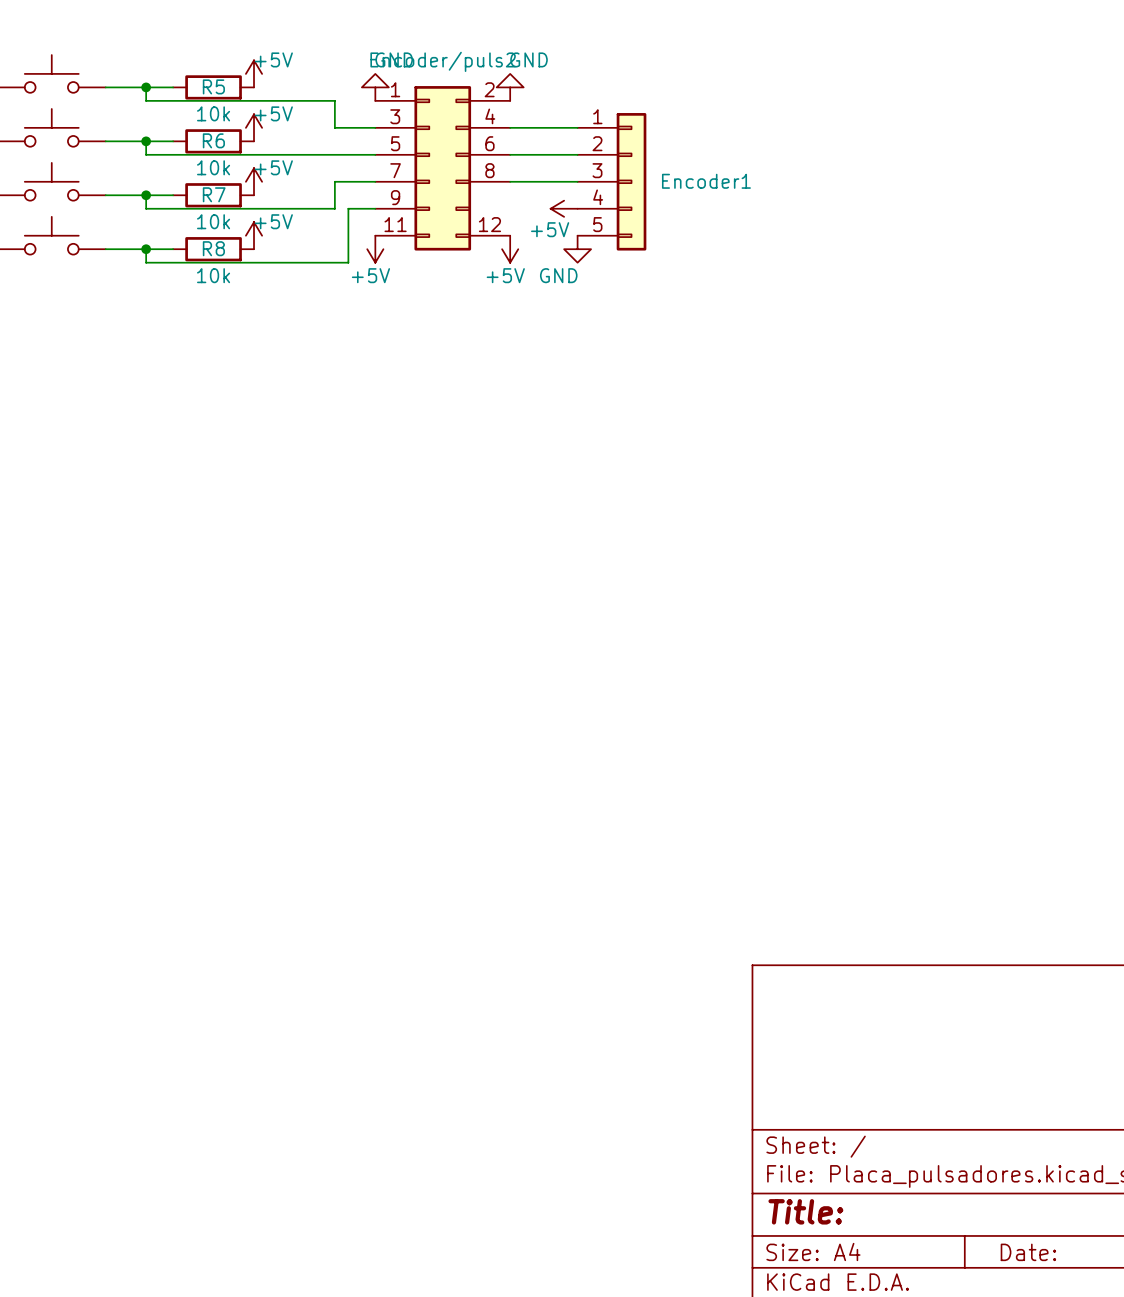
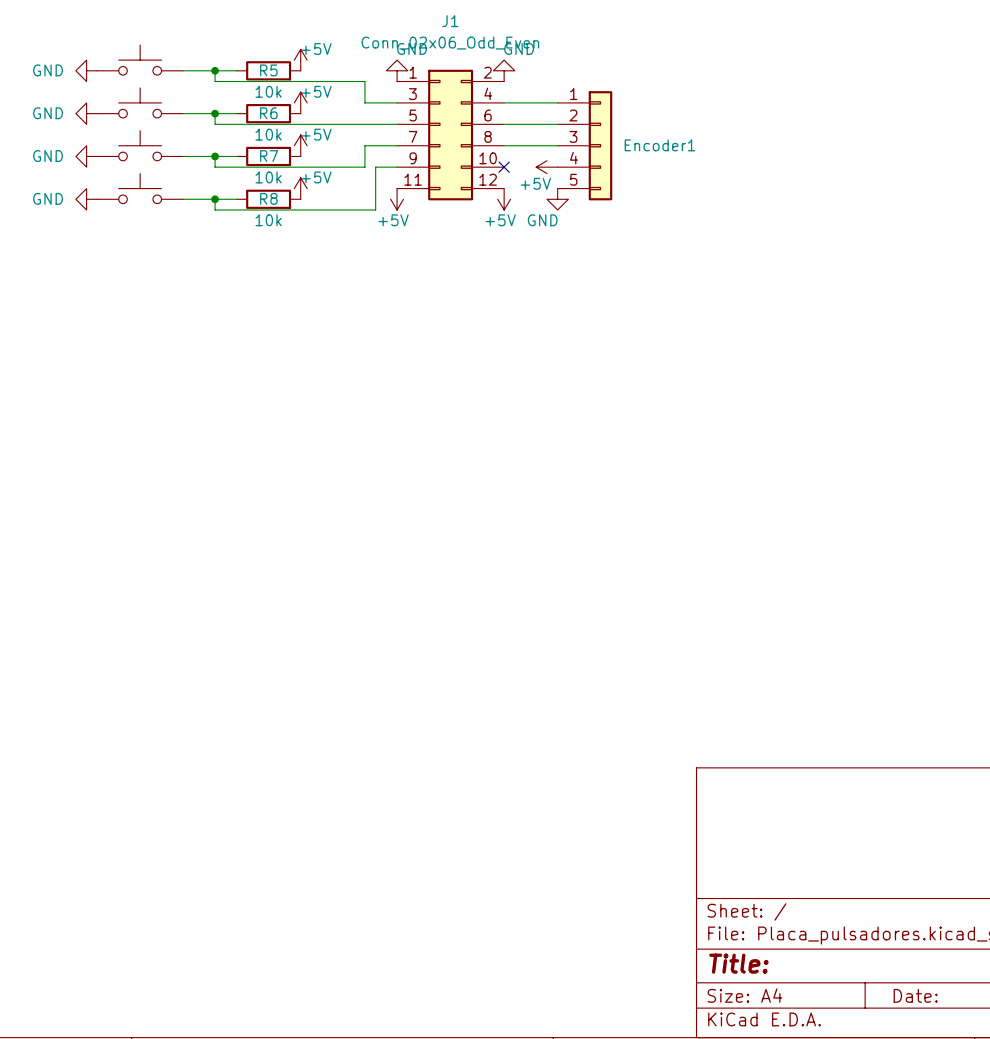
Encoder/puls2: (442, 168) -> none
J1: none -> Conn_02x06_Odd_Even (450, 135)
no-connect mark: none -> (504, 167)

